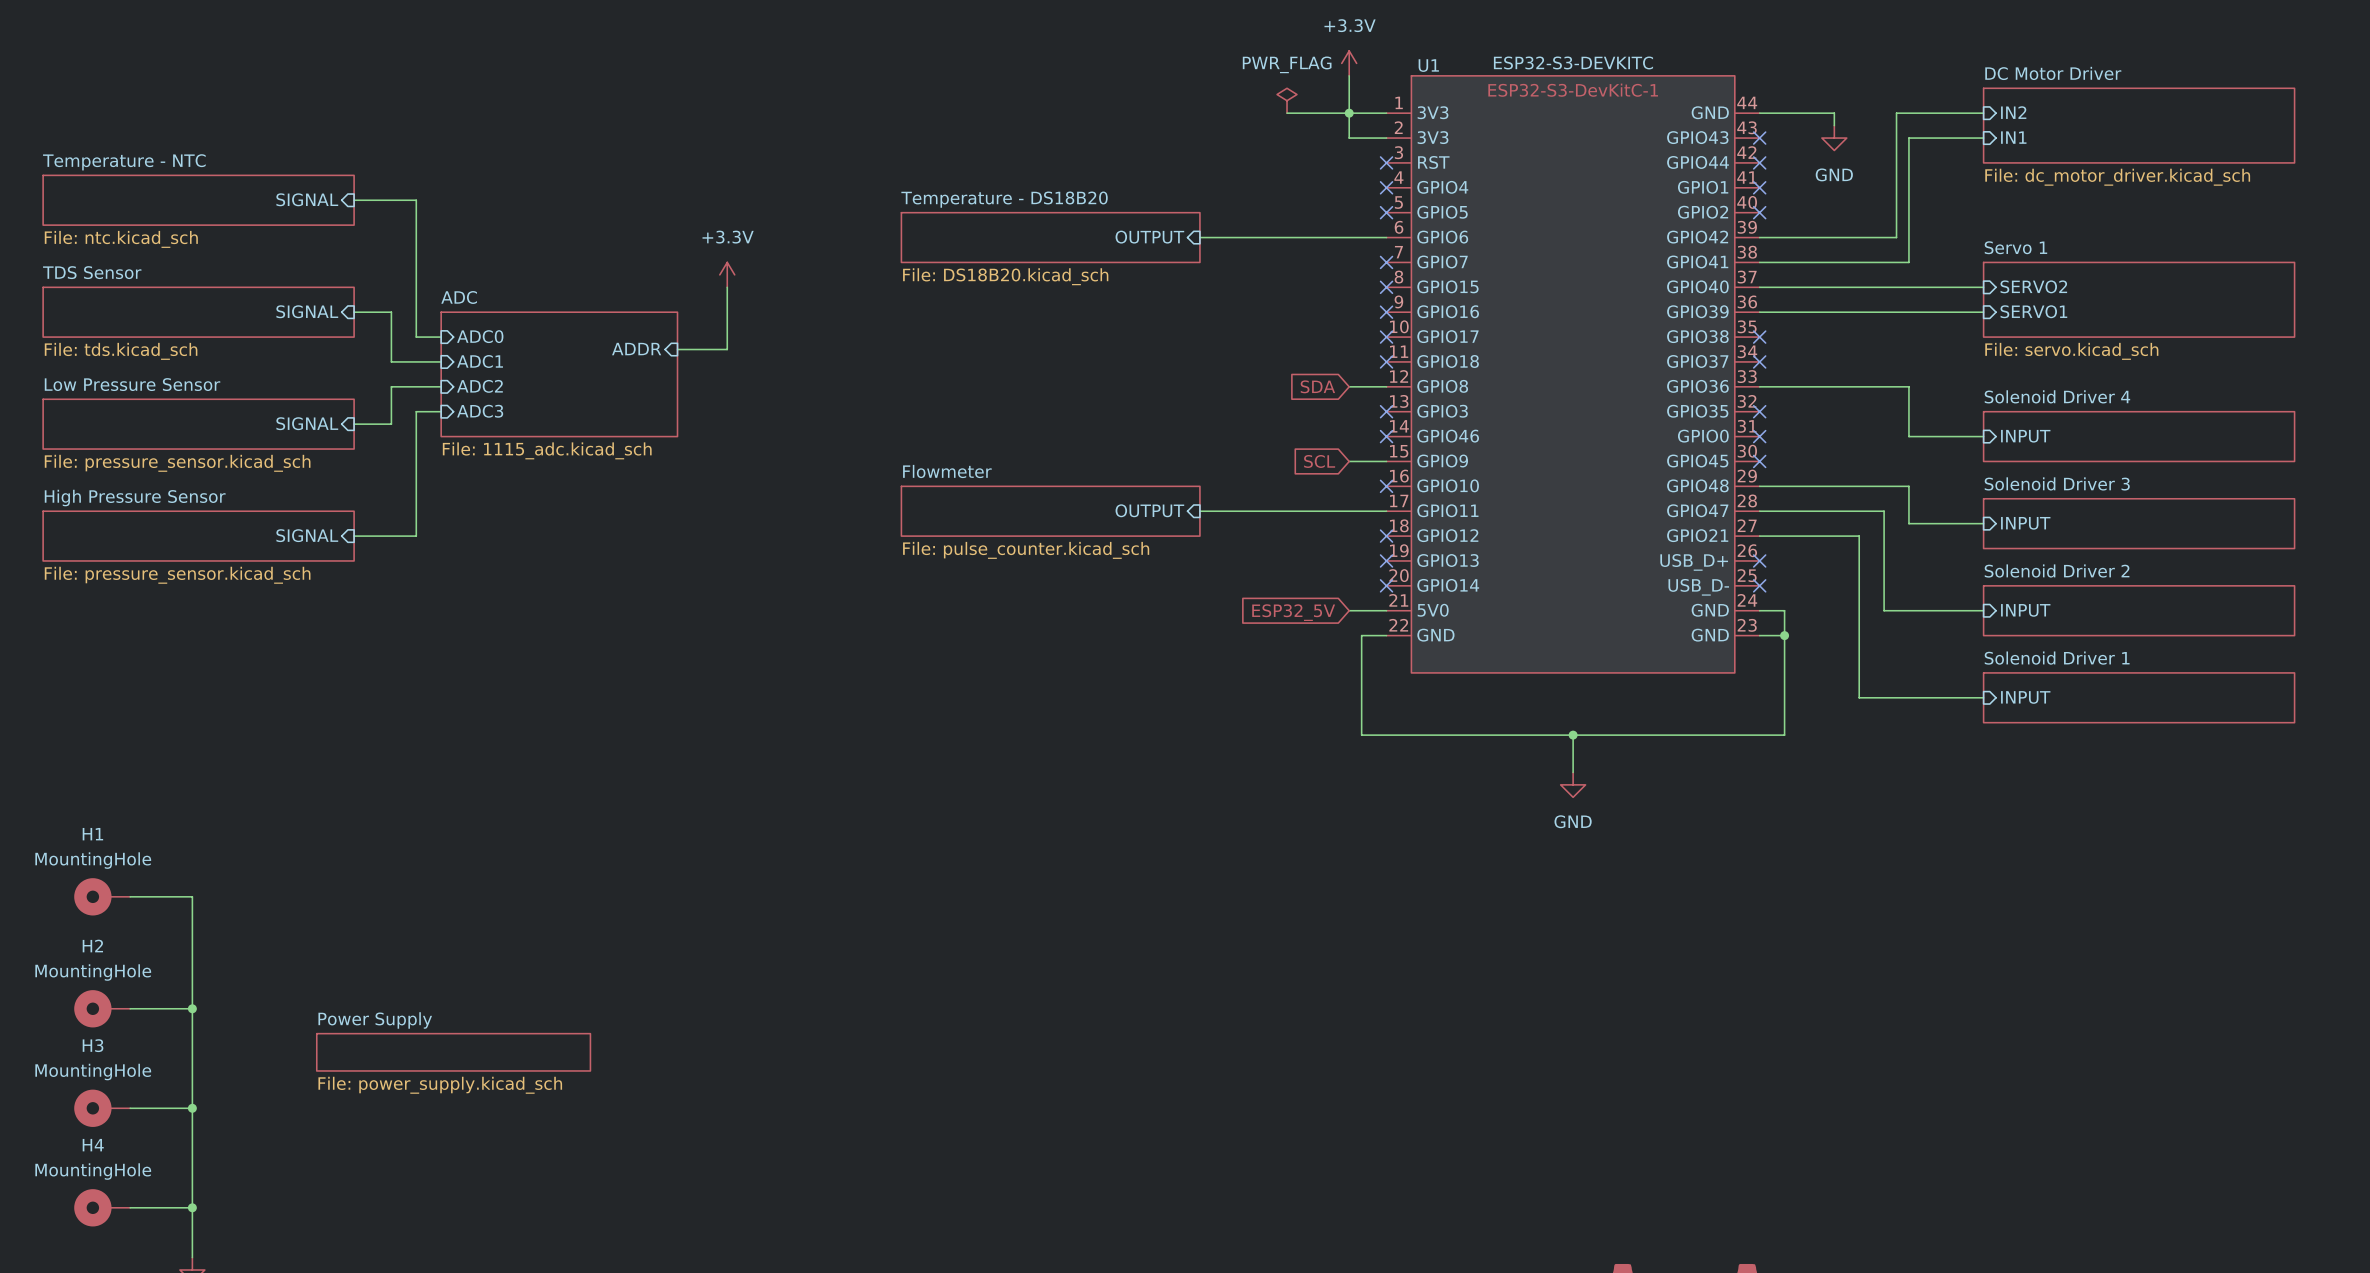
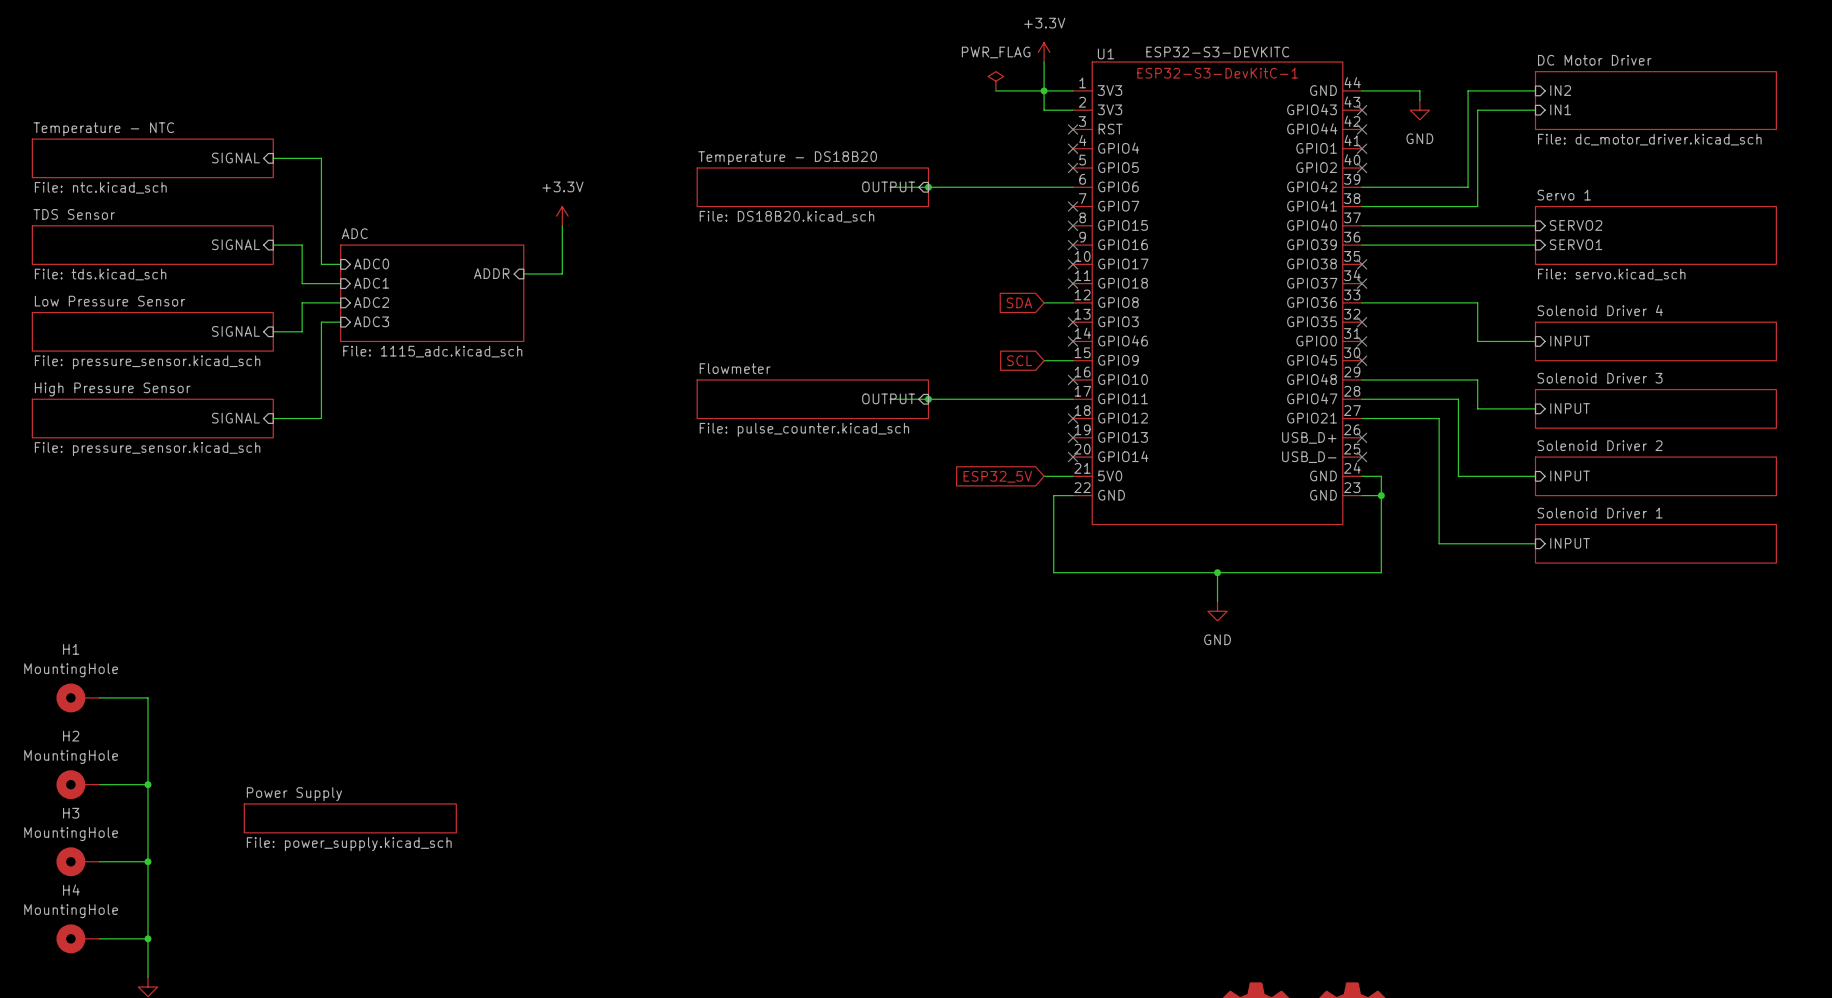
wire: none -> (889, 187) (928, 187)
junction: none -> (928, 187)
wire: none -> (889, 399) (928, 399)
junction: none -> (928, 399)

